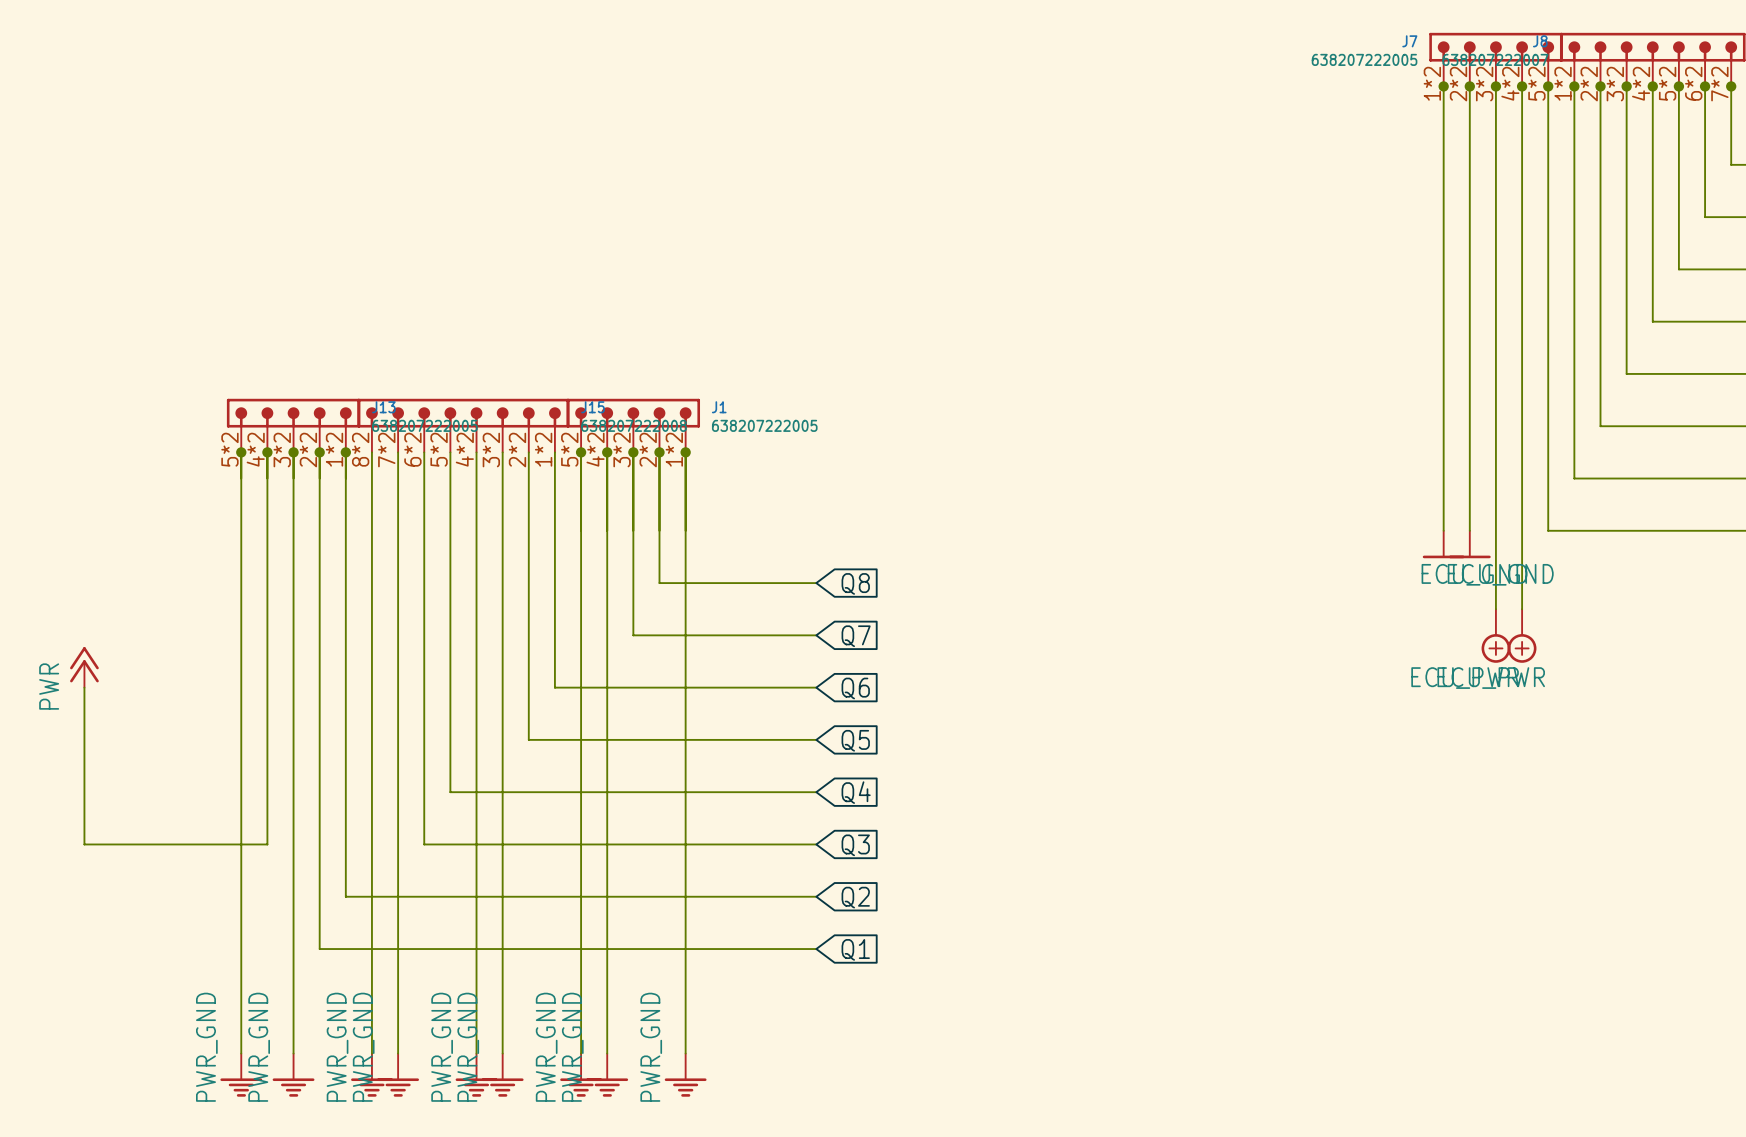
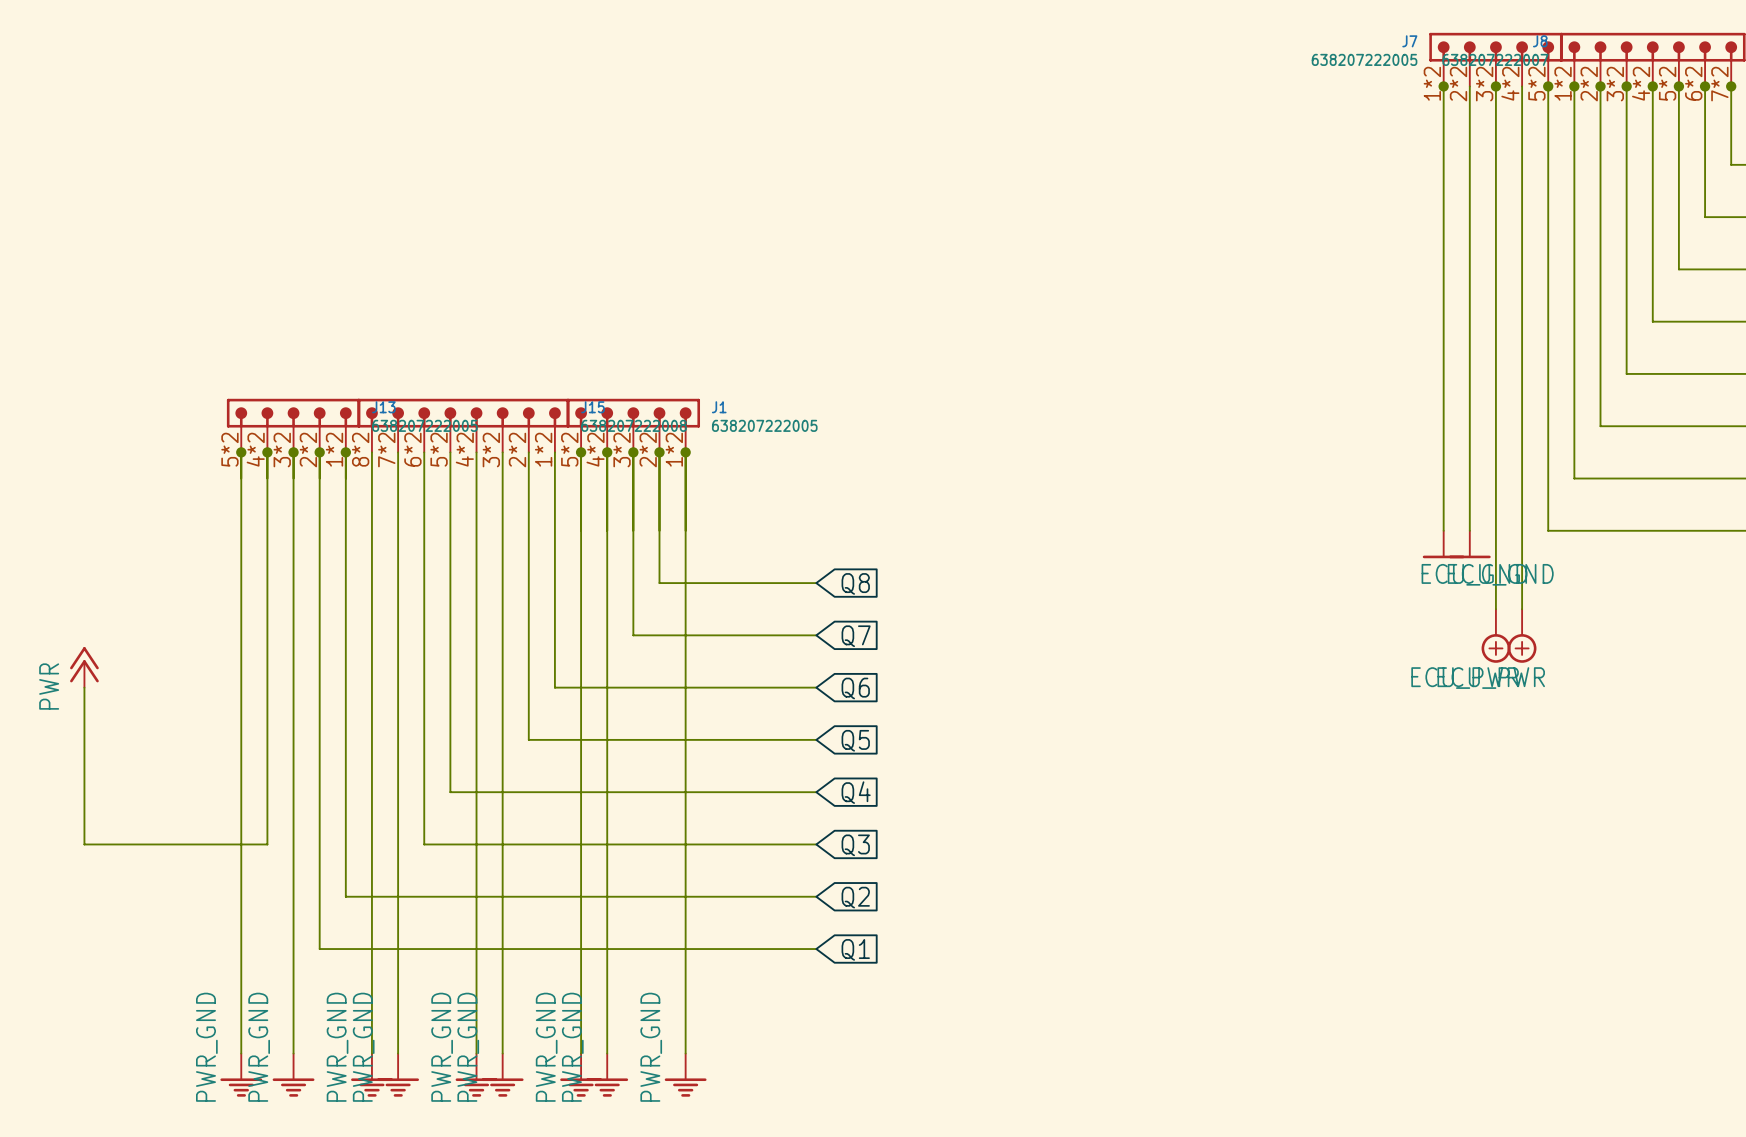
junction: (1469, 86) -> none
junction: (1522, 86) -> none

